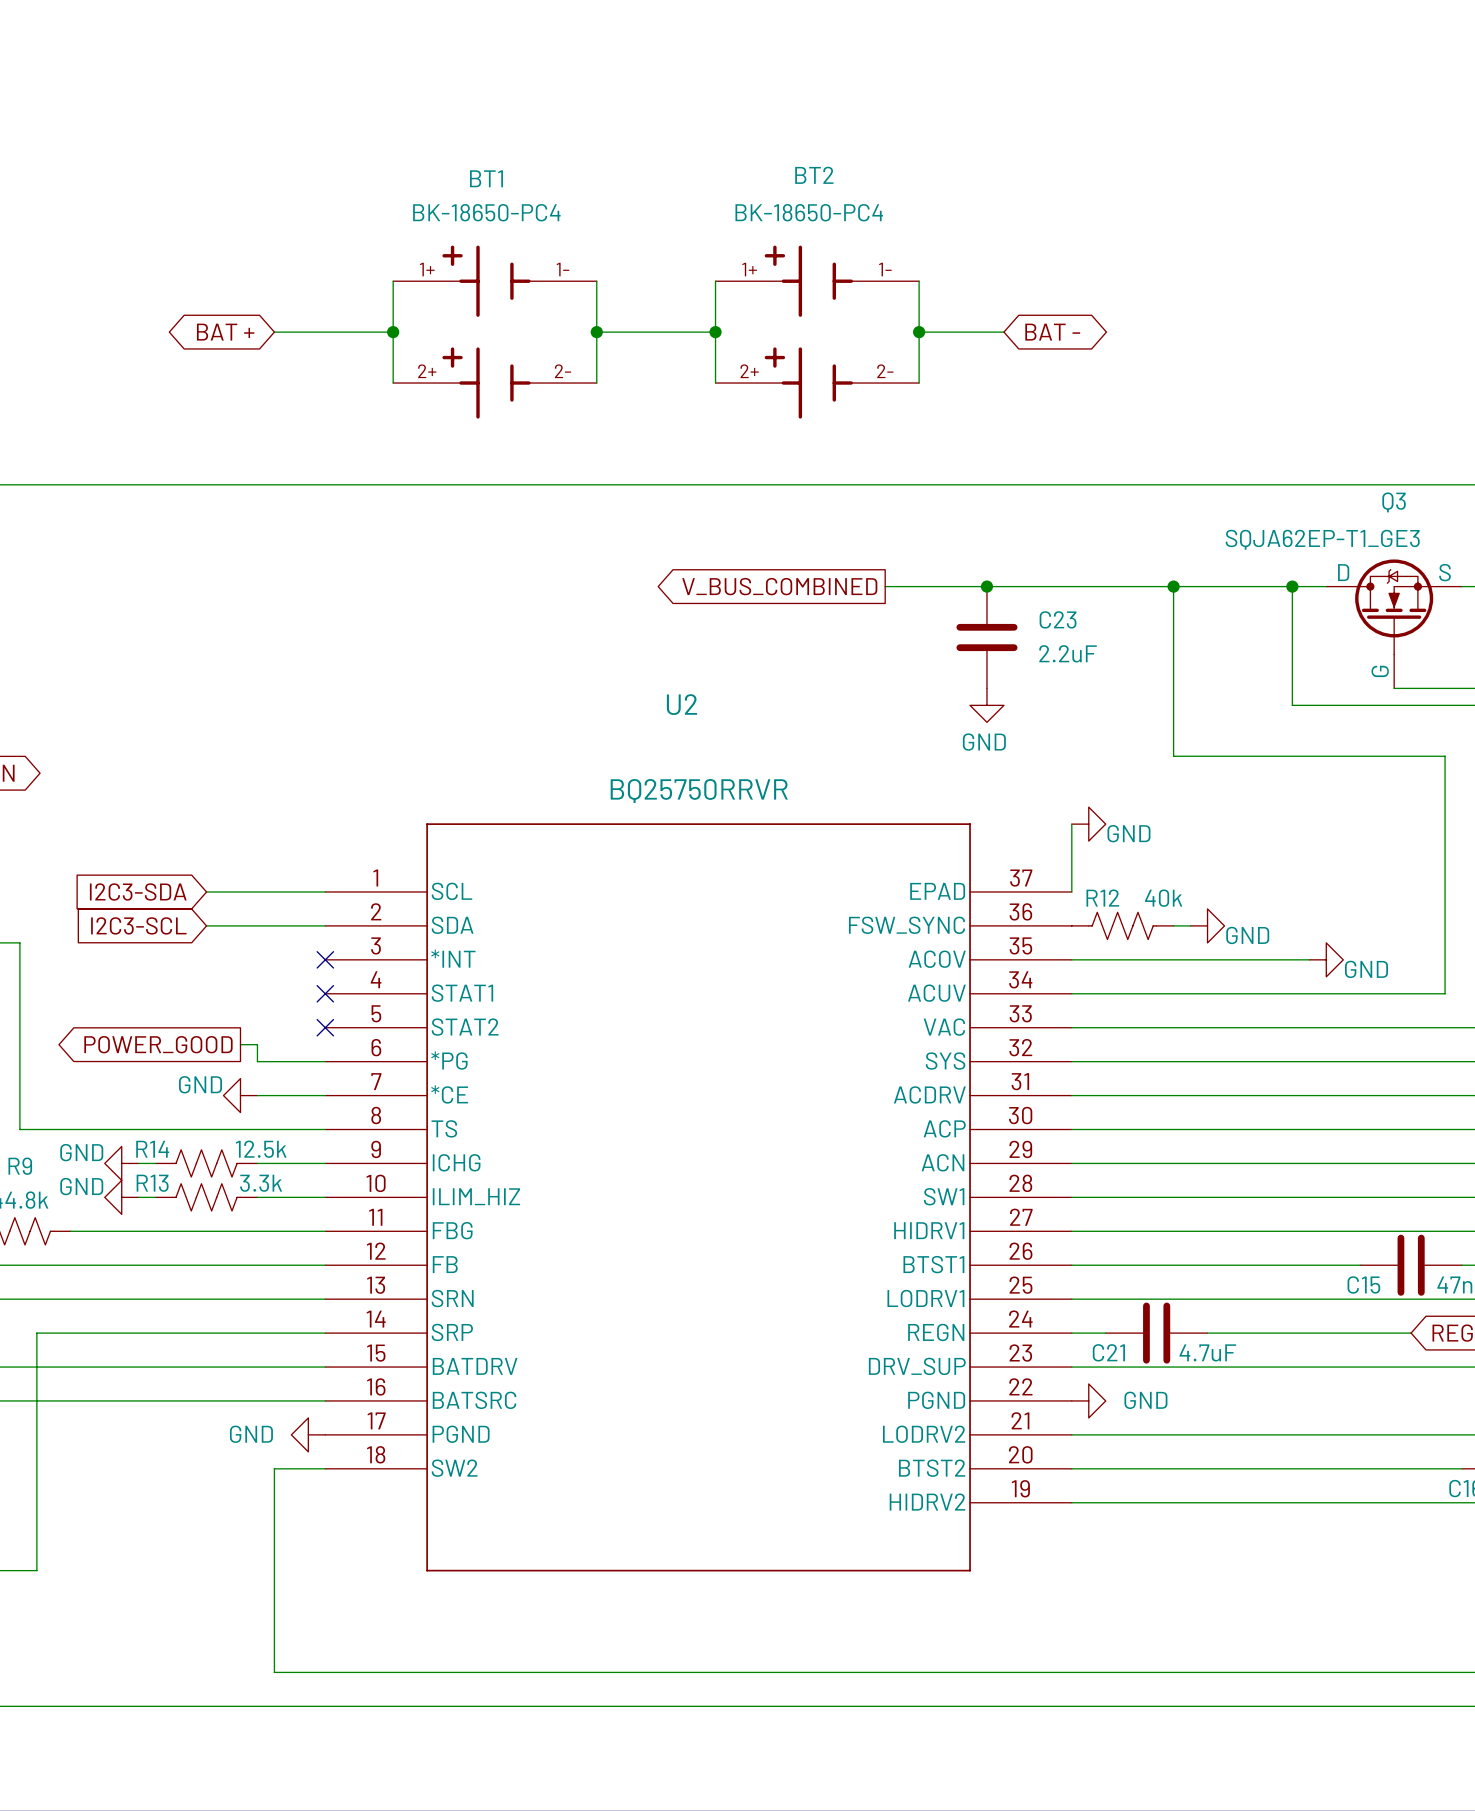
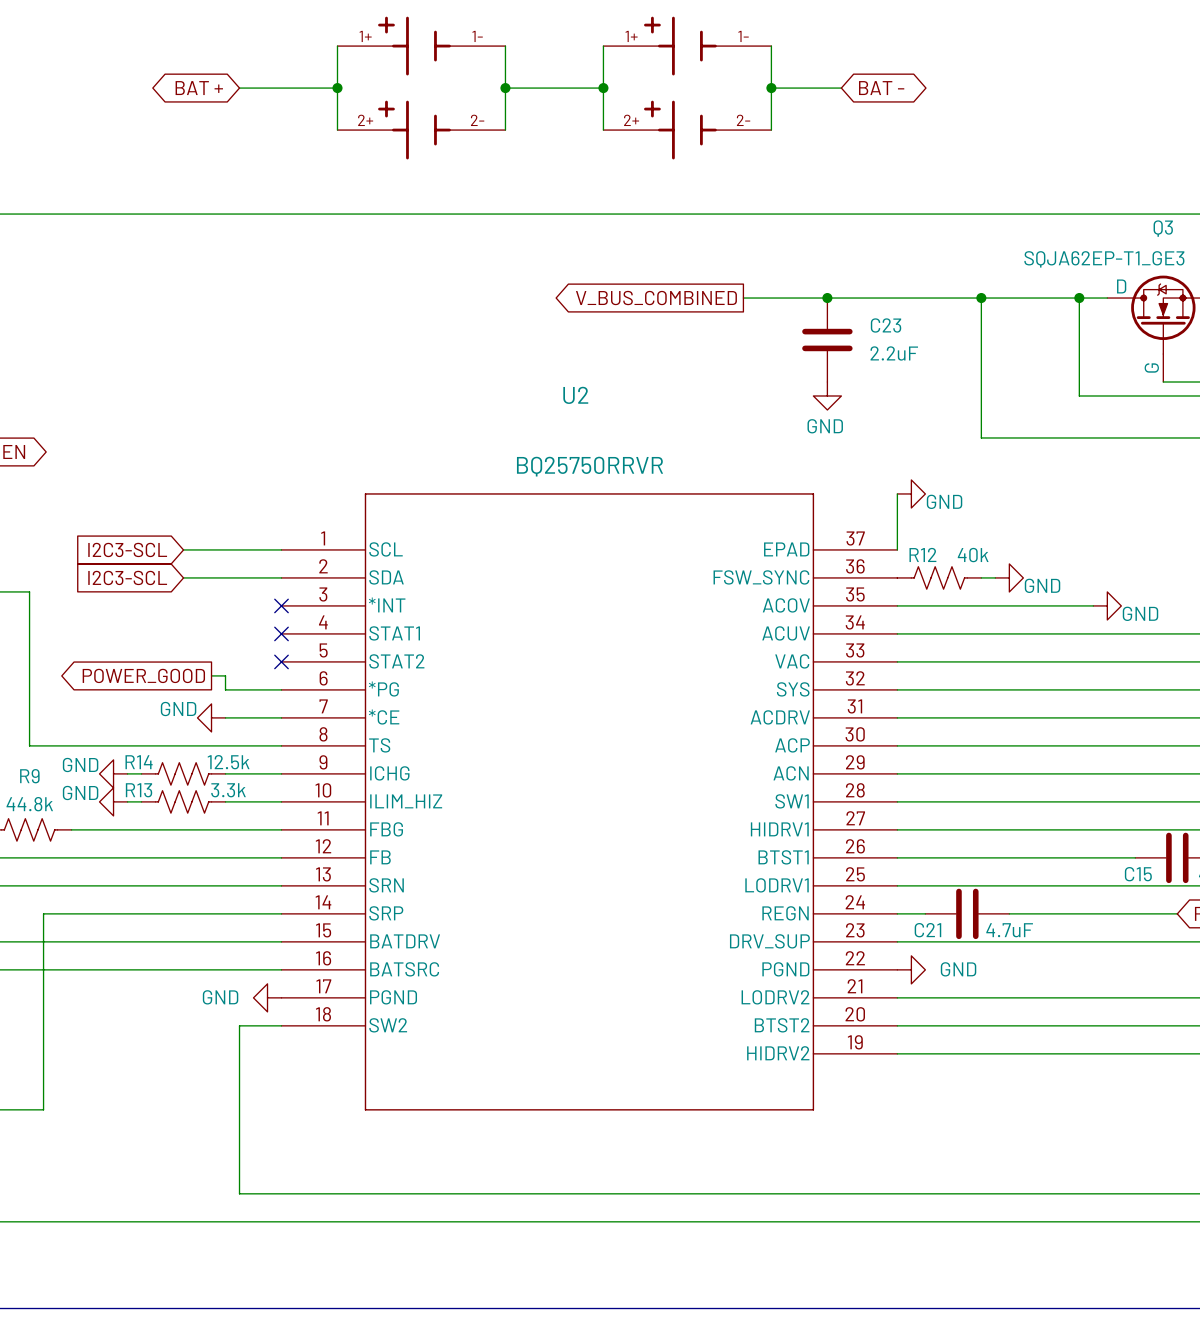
global label: I2C3-SDA (138, 892) -> I2C3-SCL (127, 549)

